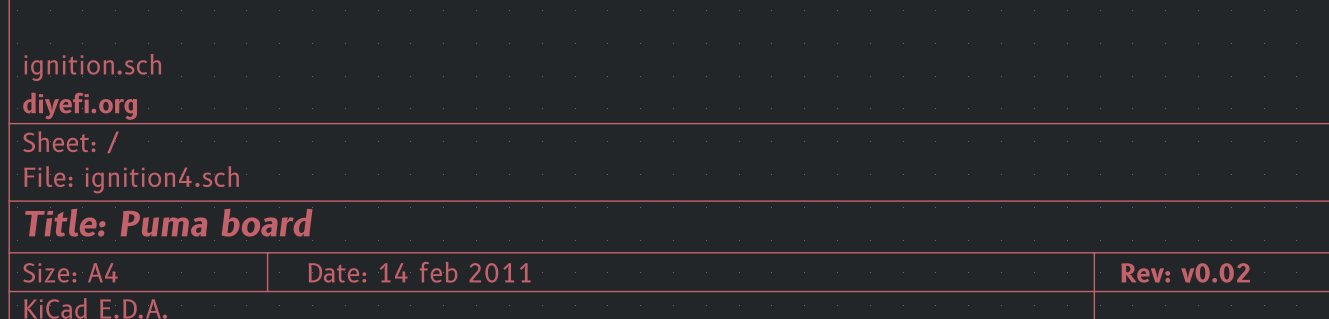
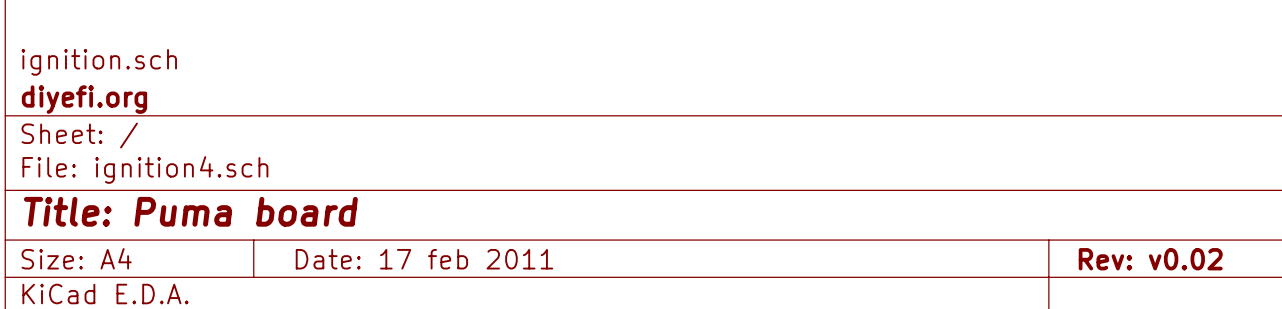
title block: Date: 14 feb 2011 (419, 272) -> Date: 17 feb 2011 (424, 259)

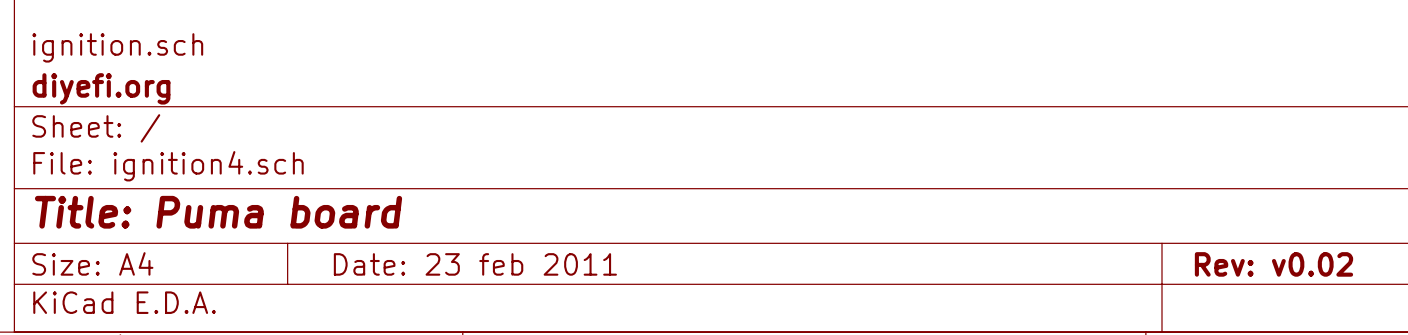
title block: Date: 17 feb 2011 (424, 259) -> Date: 23 feb 2011 (475, 264)

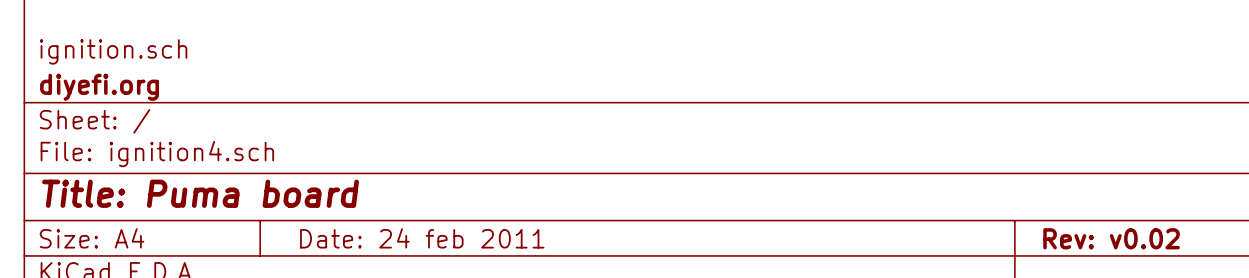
title block: Date: 23 feb 2011 (475, 264) -> Date: 24 feb 2011 (422, 238)

